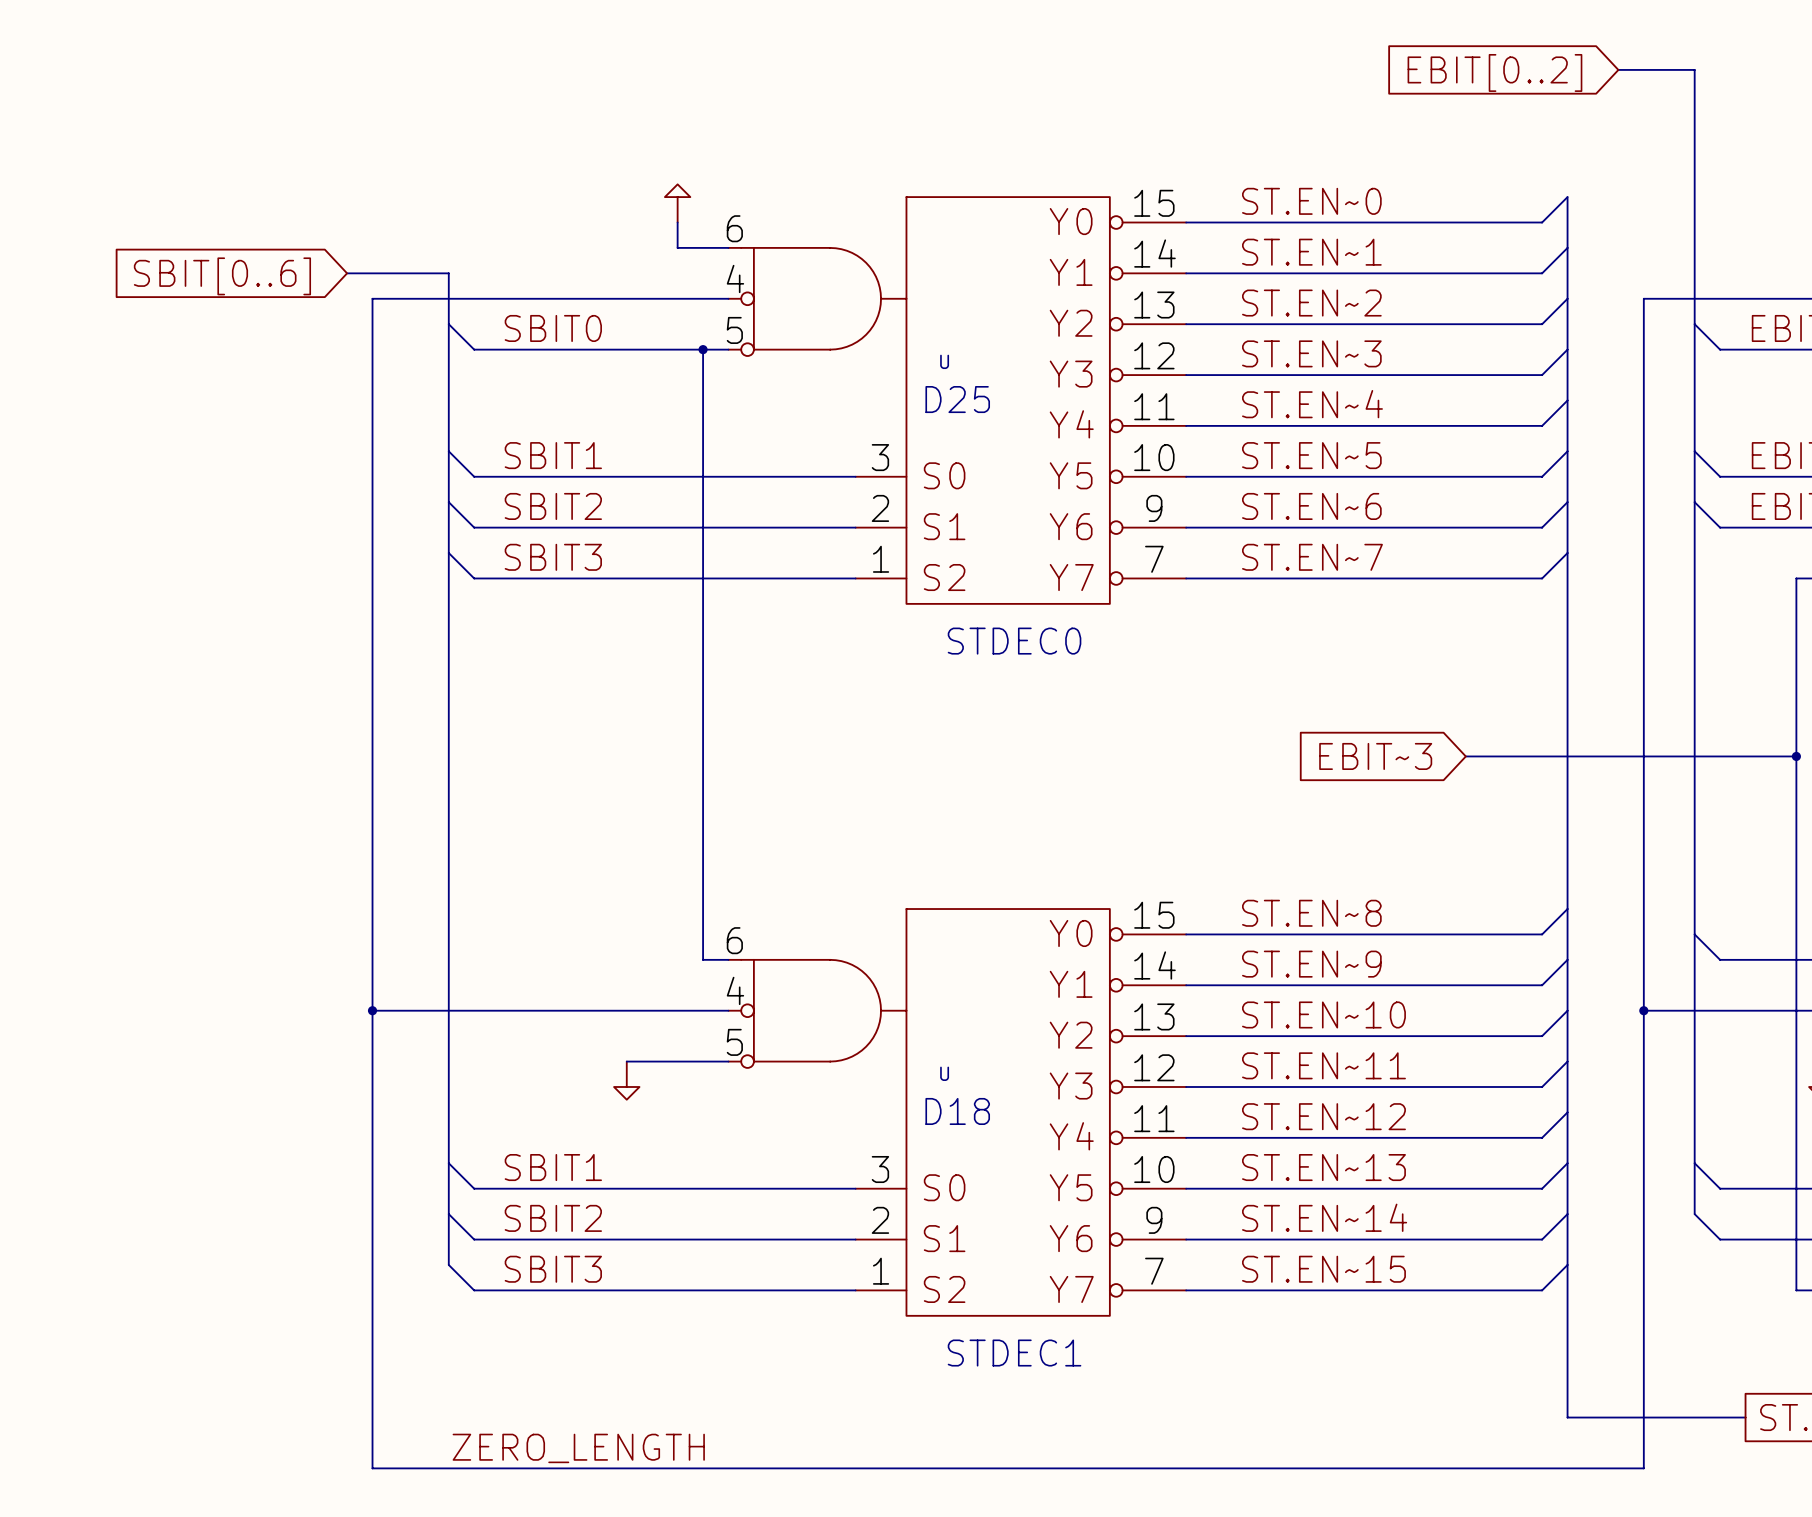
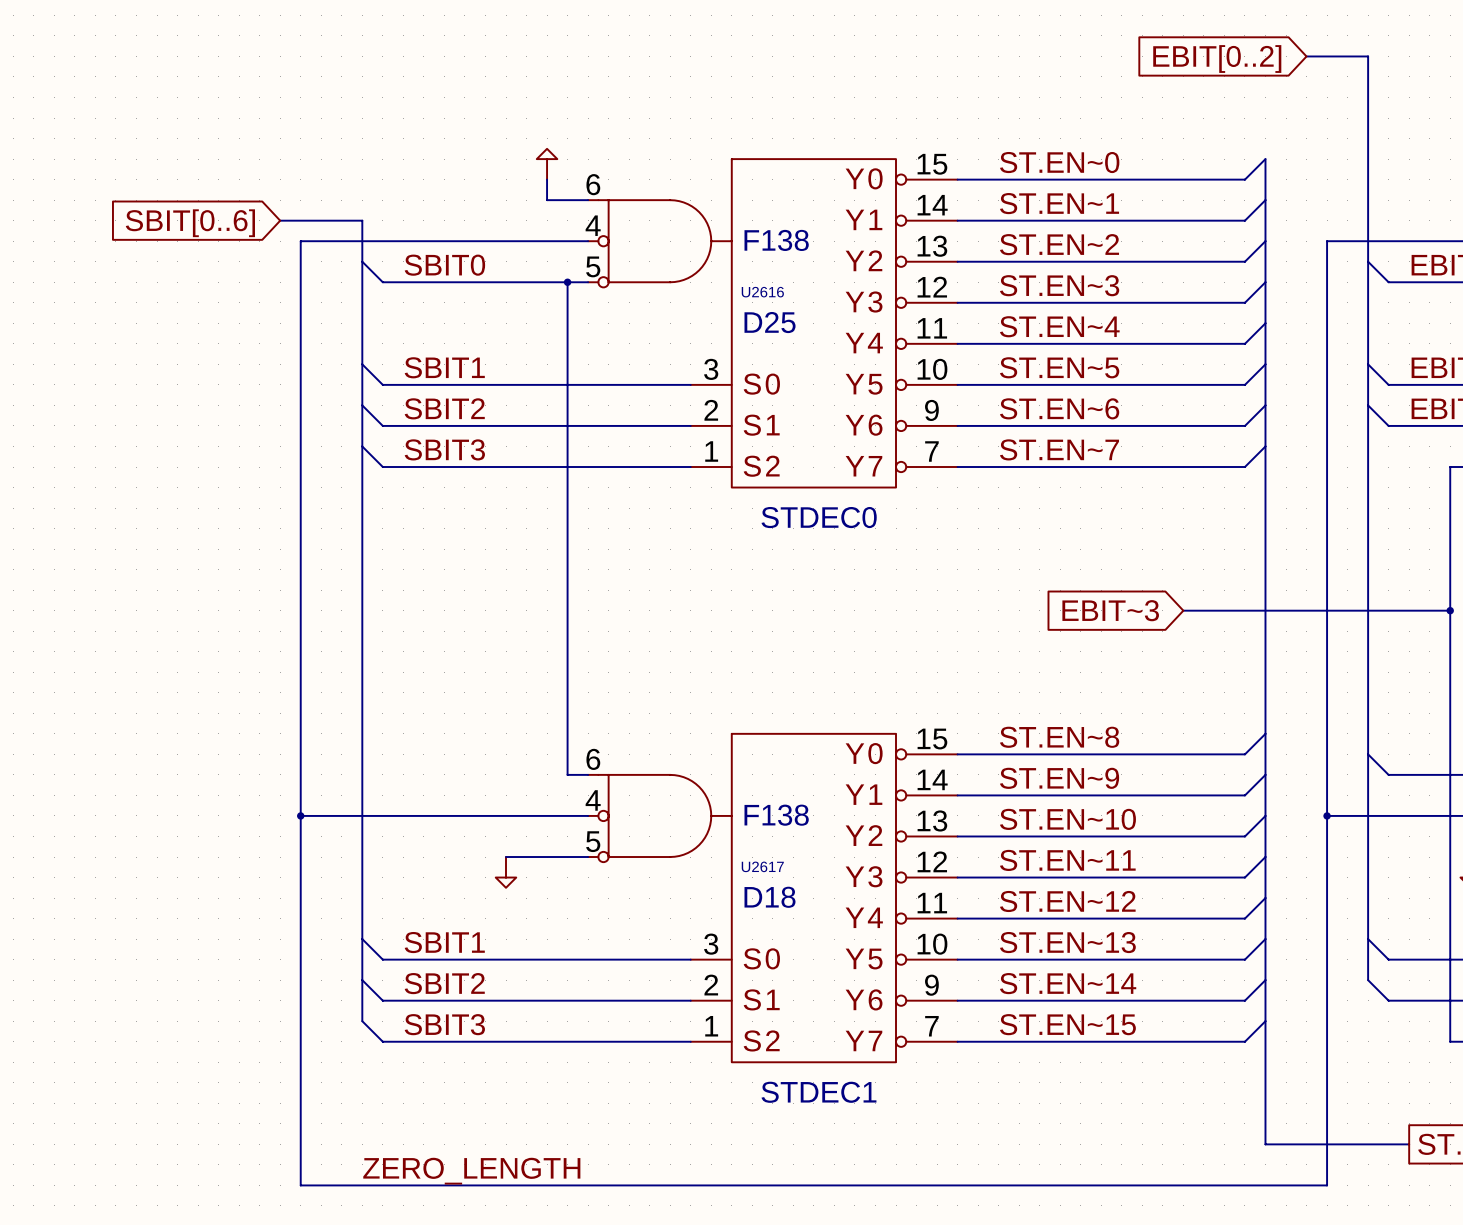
U value: none -> F138 (776, 240)
U name: U (944, 361) -> U2616 (762, 292)
U value: none -> F138 (776, 815)
U name: U (944, 1073) -> U2617 (762, 866)

